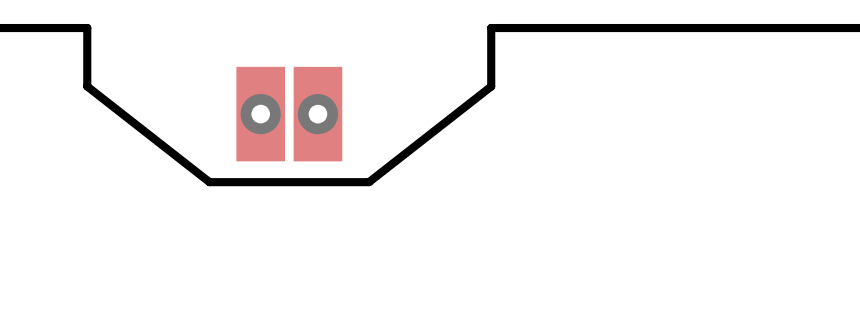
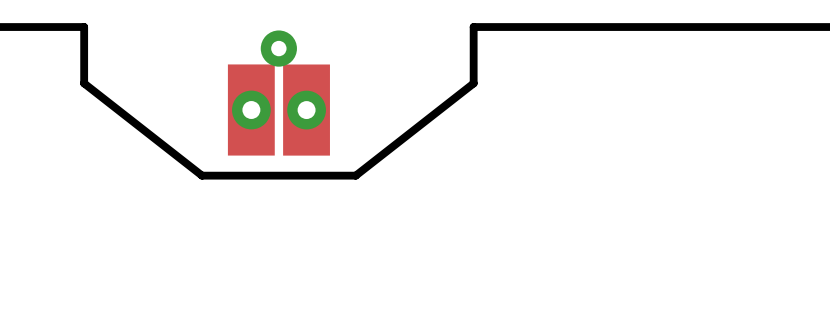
via: none -> (278, 48)

